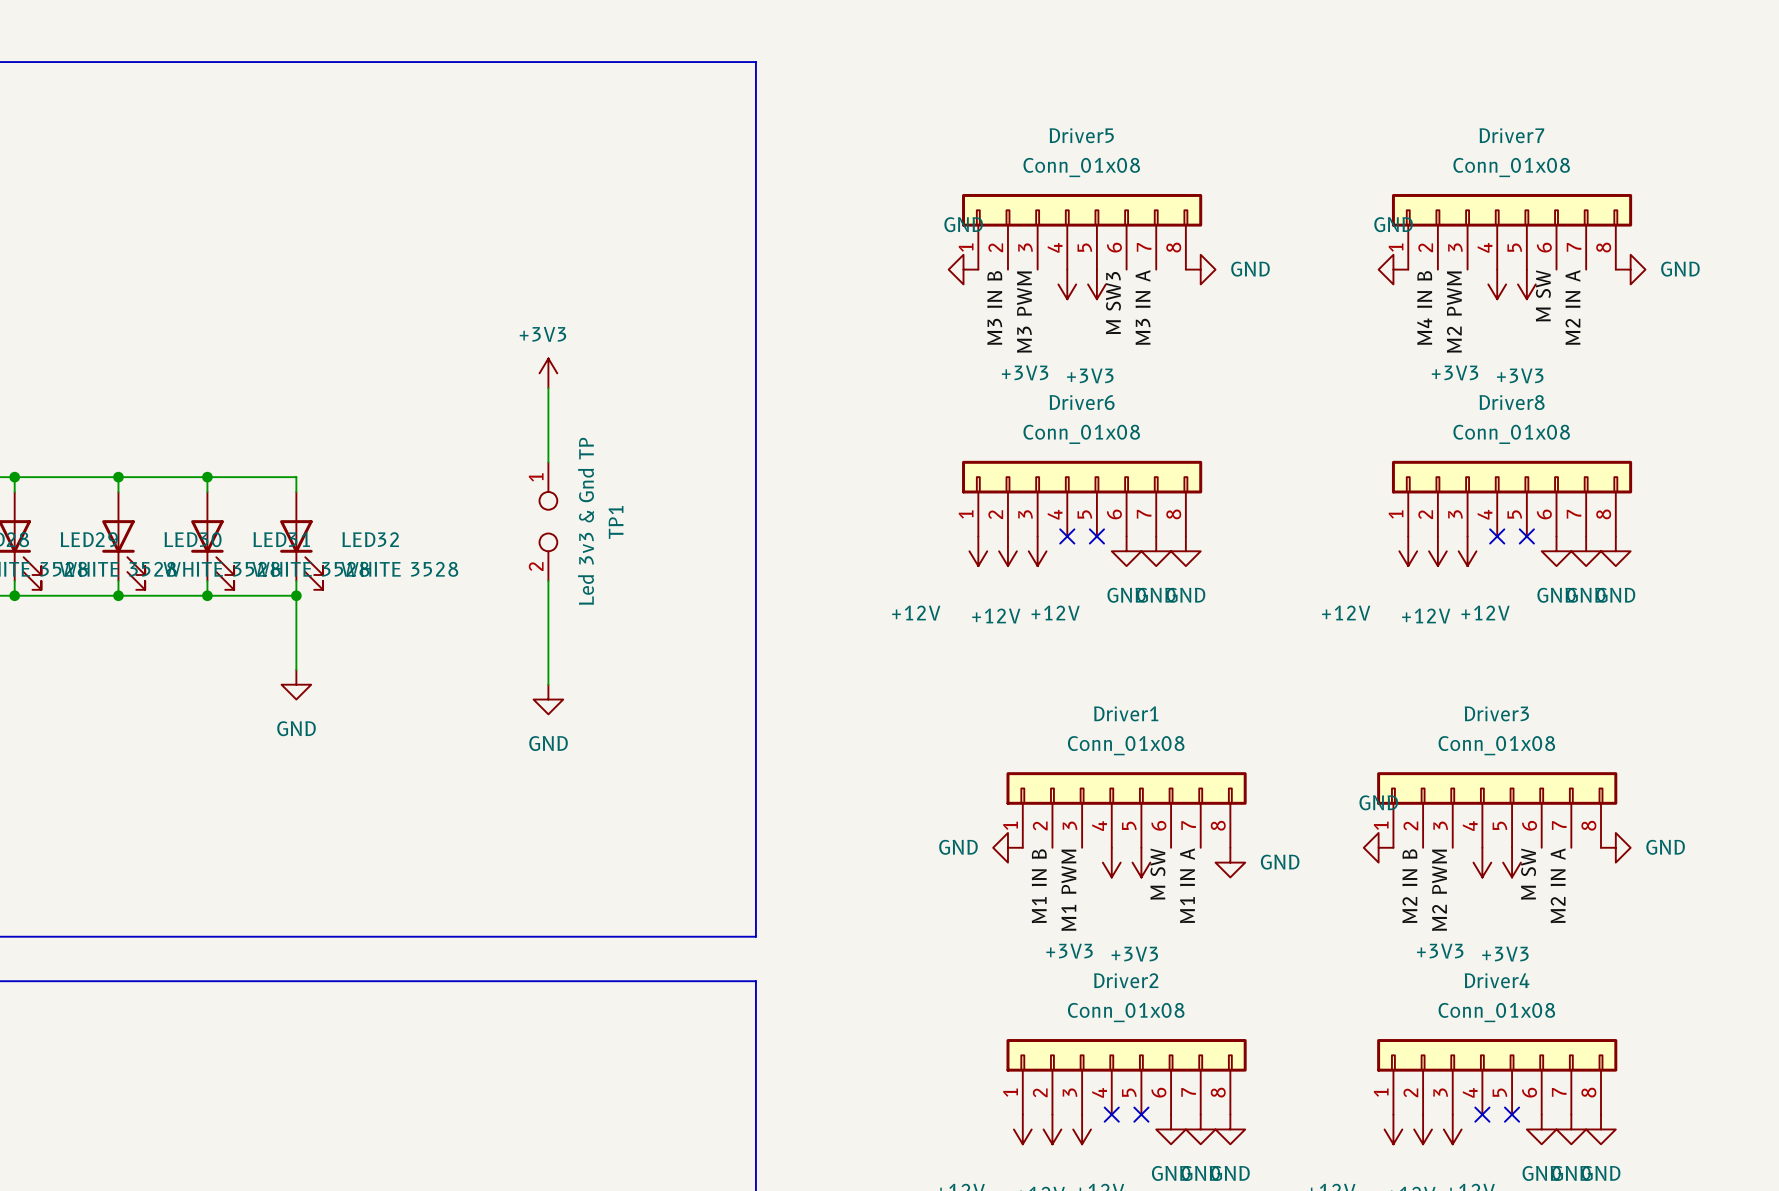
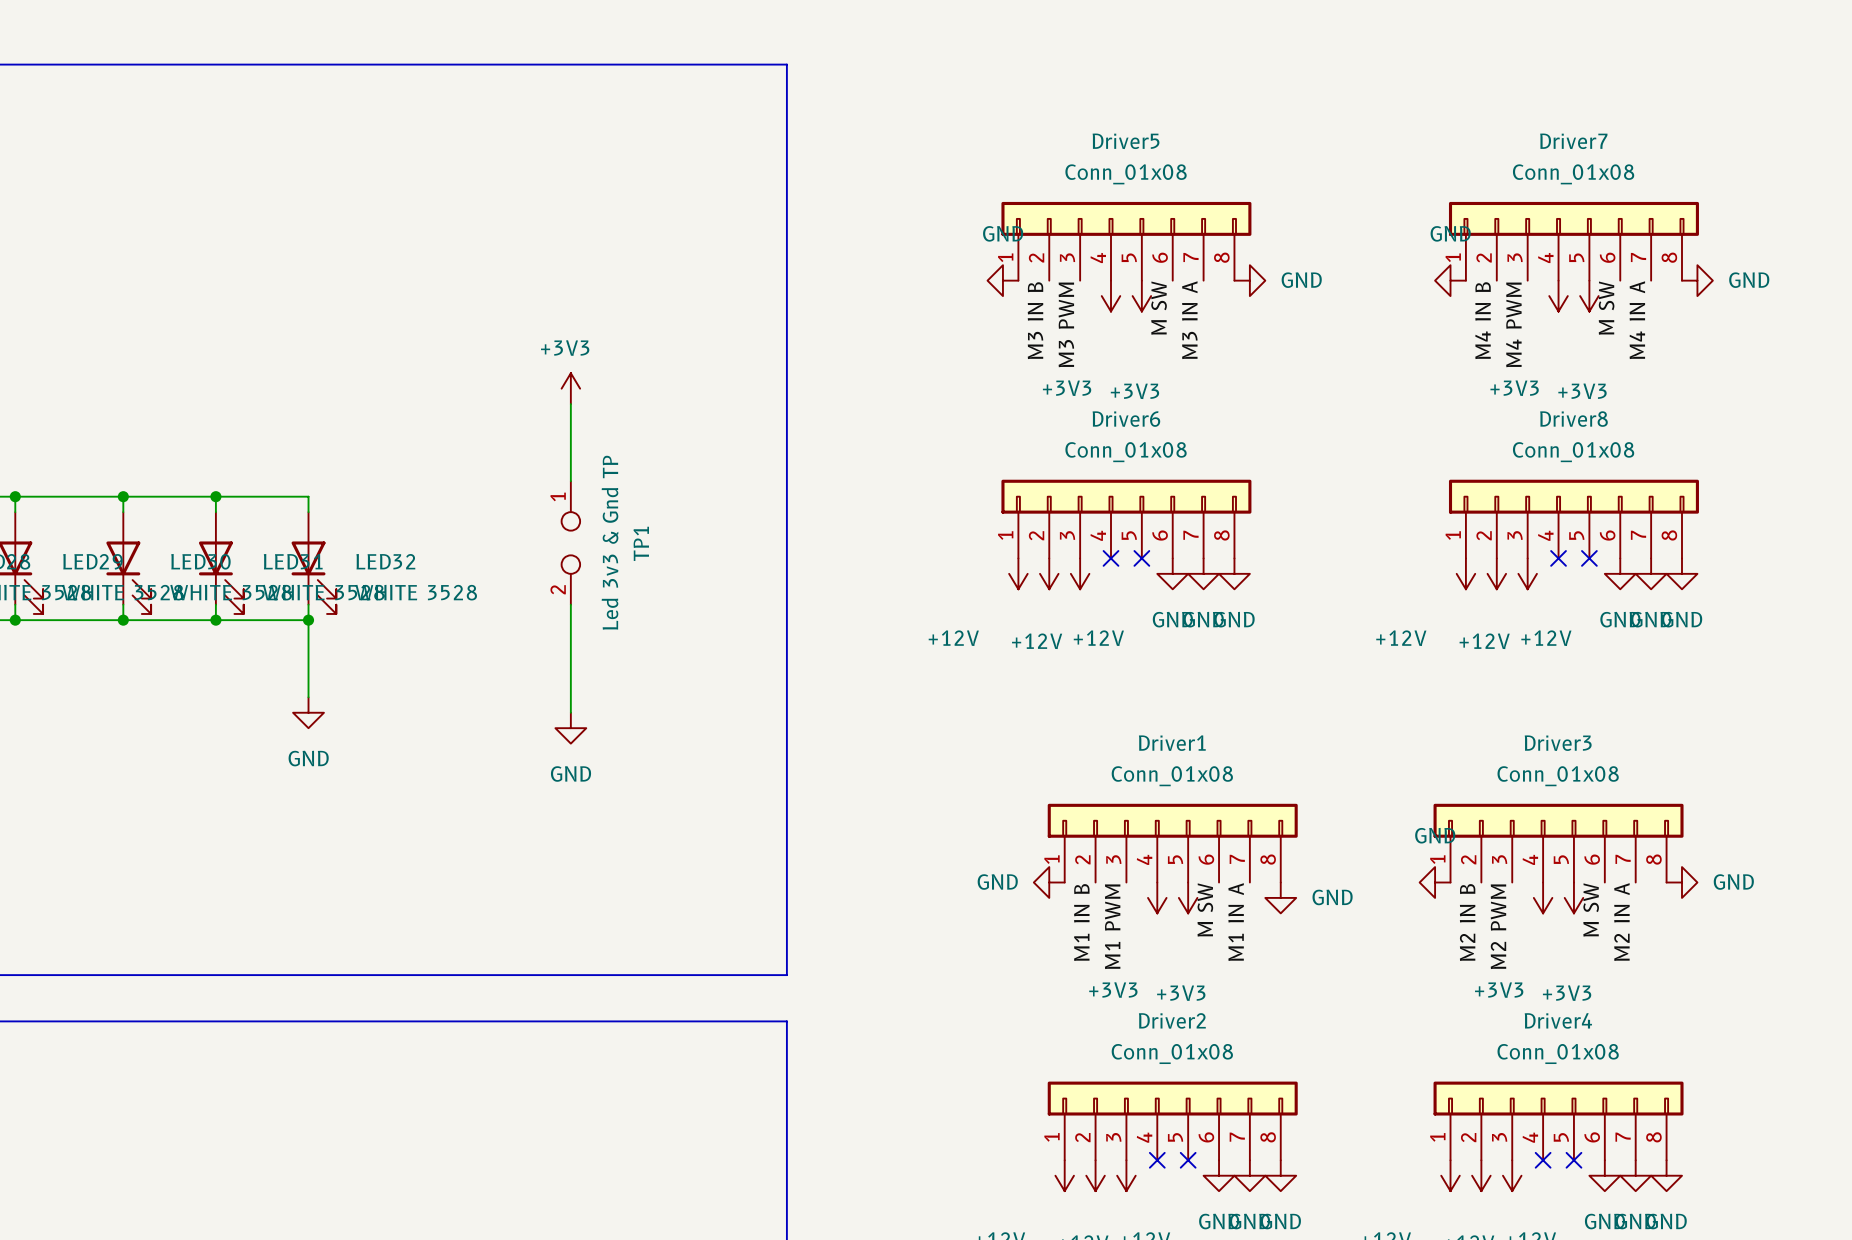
label: M SW3 (1113, 303) -> M SW (1159, 308)
label: M2 IN A (1572, 307) -> M4 IN A (1637, 320)
label: M2 PWM (1454, 312) -> M4 PWM (1513, 324)

